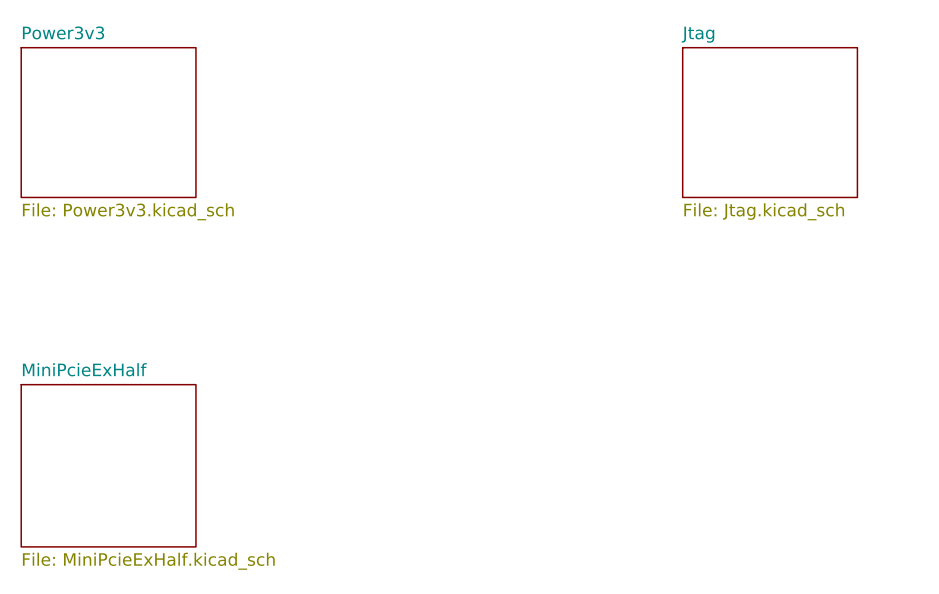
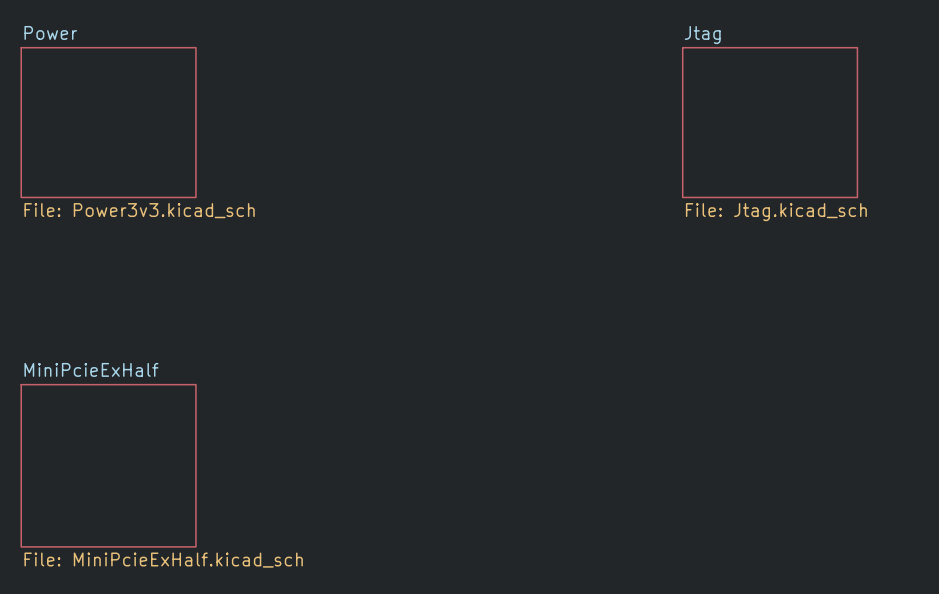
sheet Power3v3 name: Power3v3 (63, 32) -> Power (50, 32)

